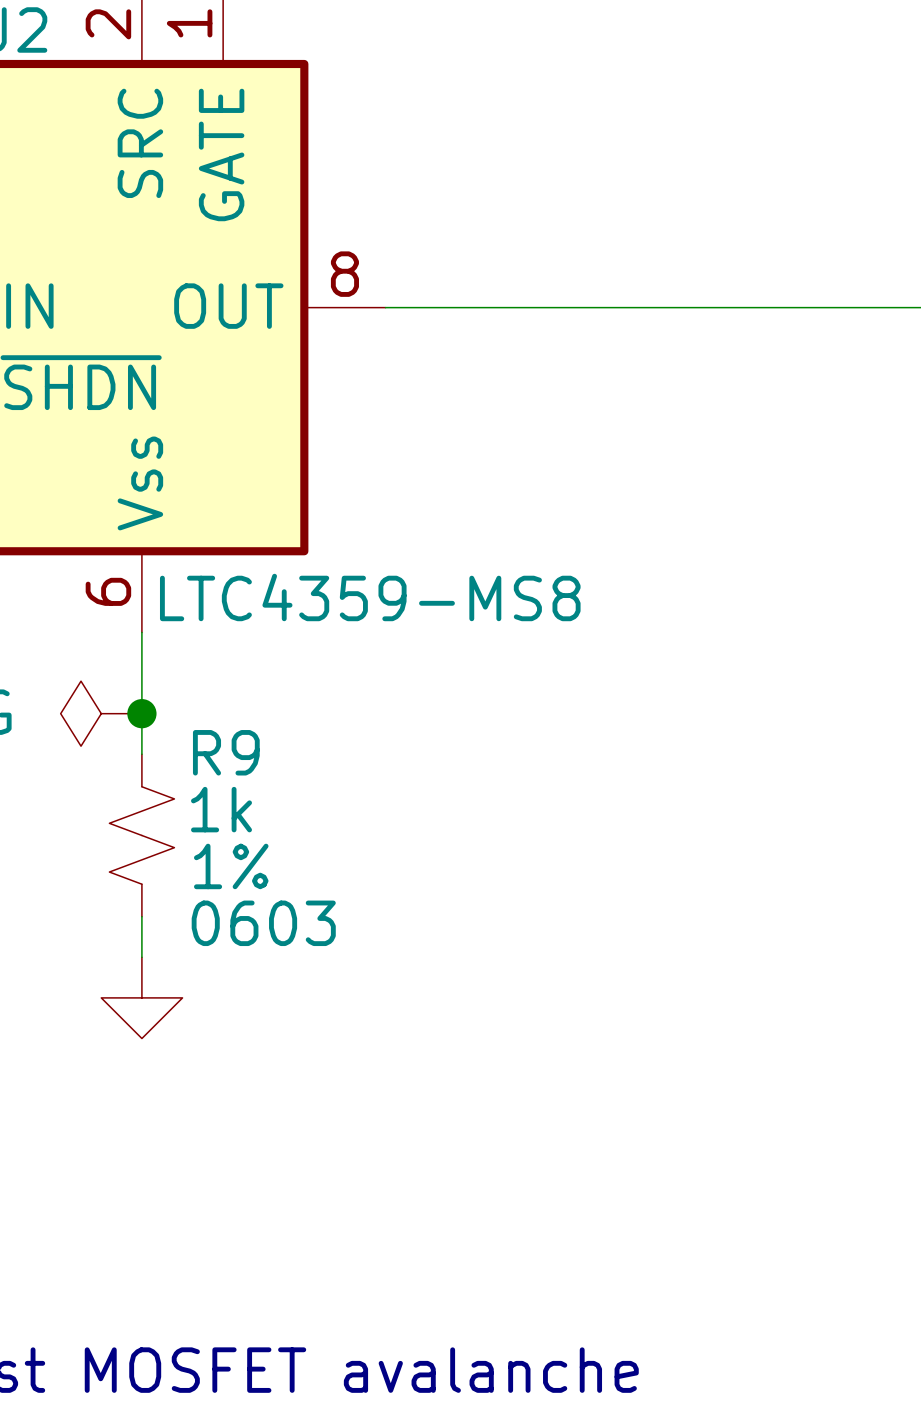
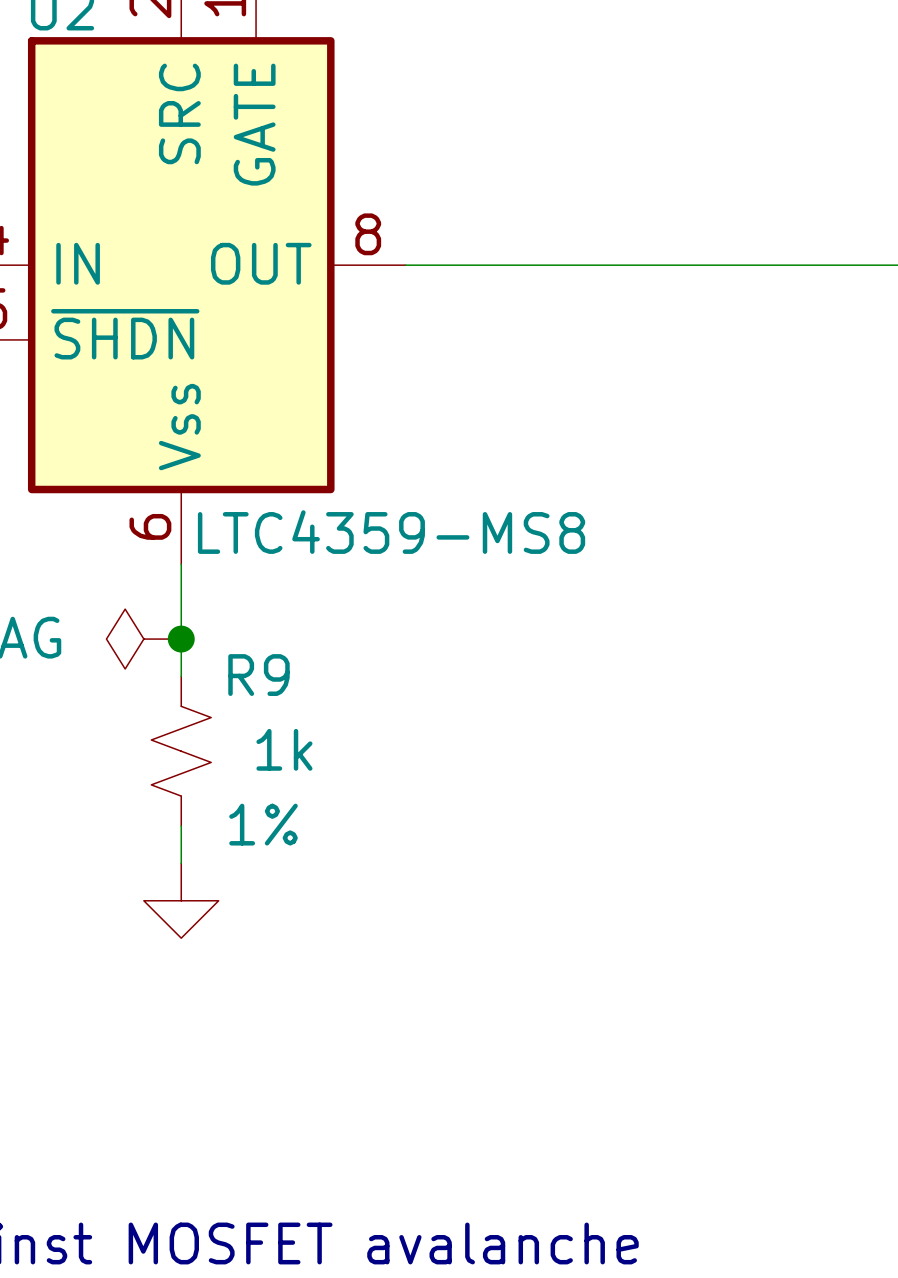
R9 value position: 1k (221, 809) -> 1k (284, 749)
R9 text position: 1% (231, 866) -> 1% (263, 824)
R9 text: 0603 (263, 923) -> none

